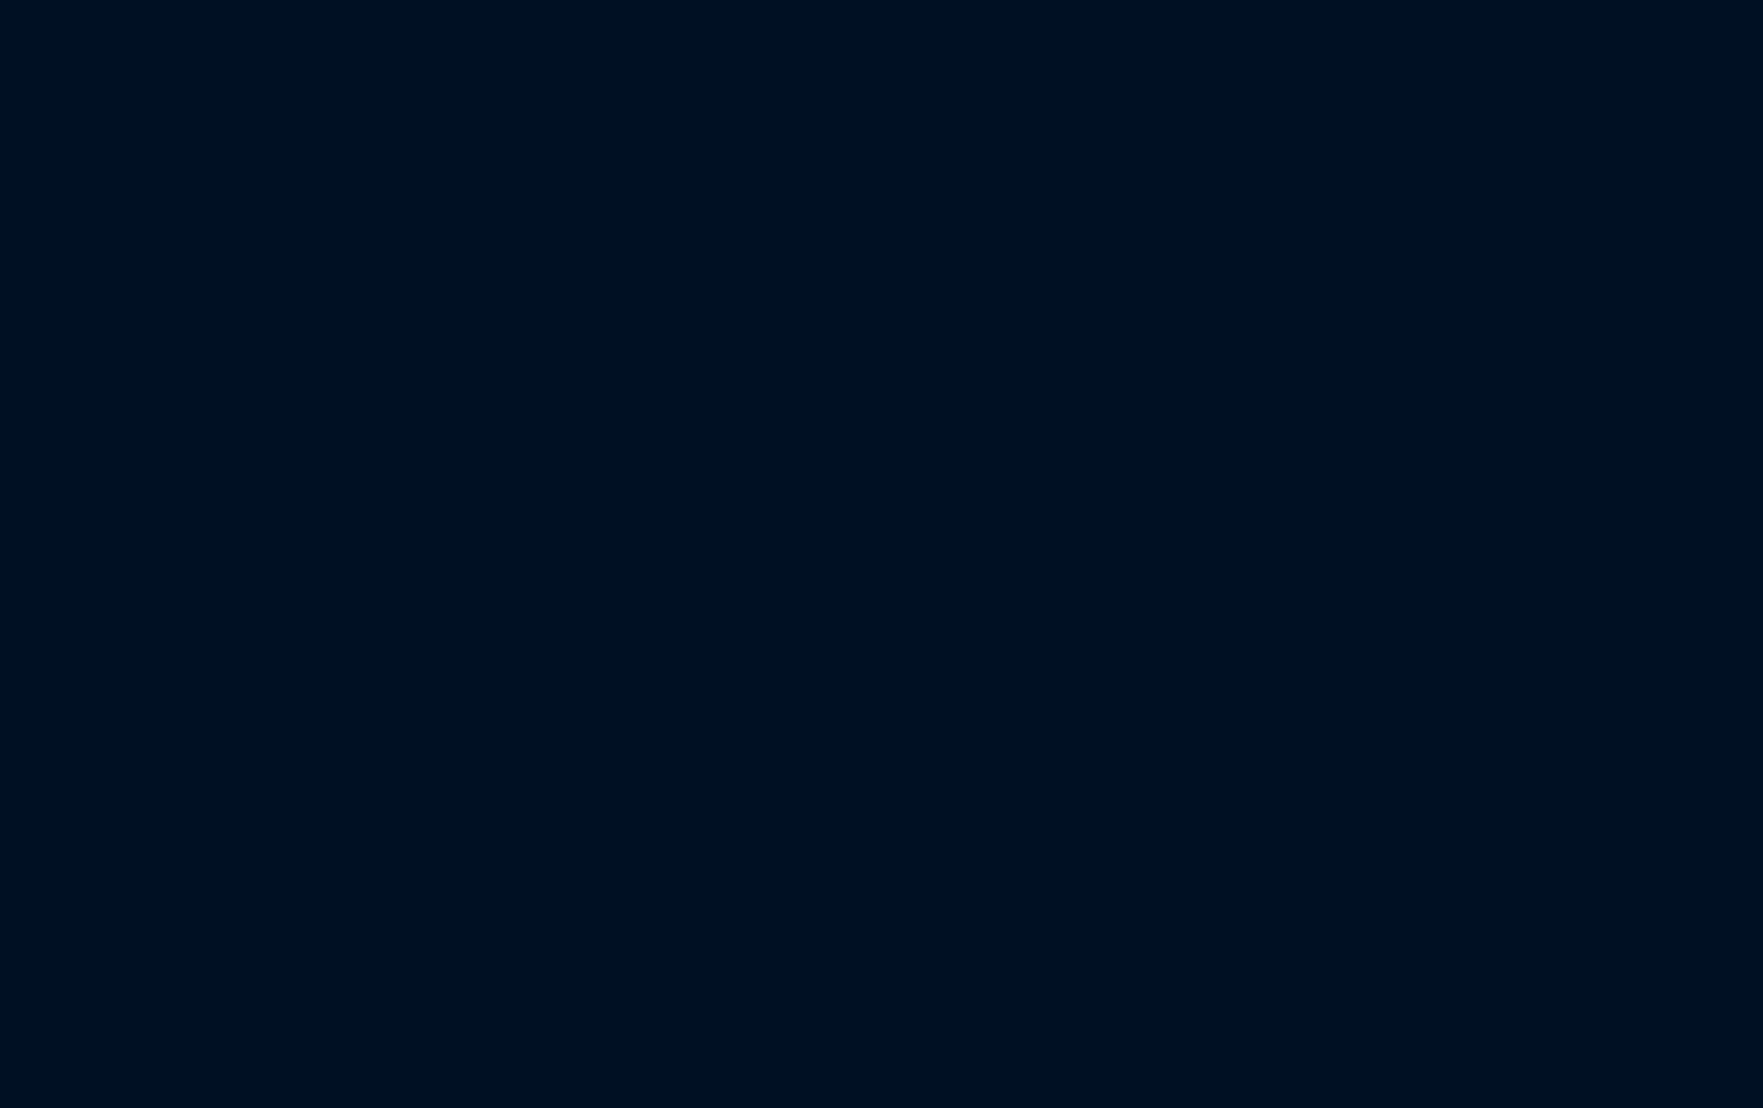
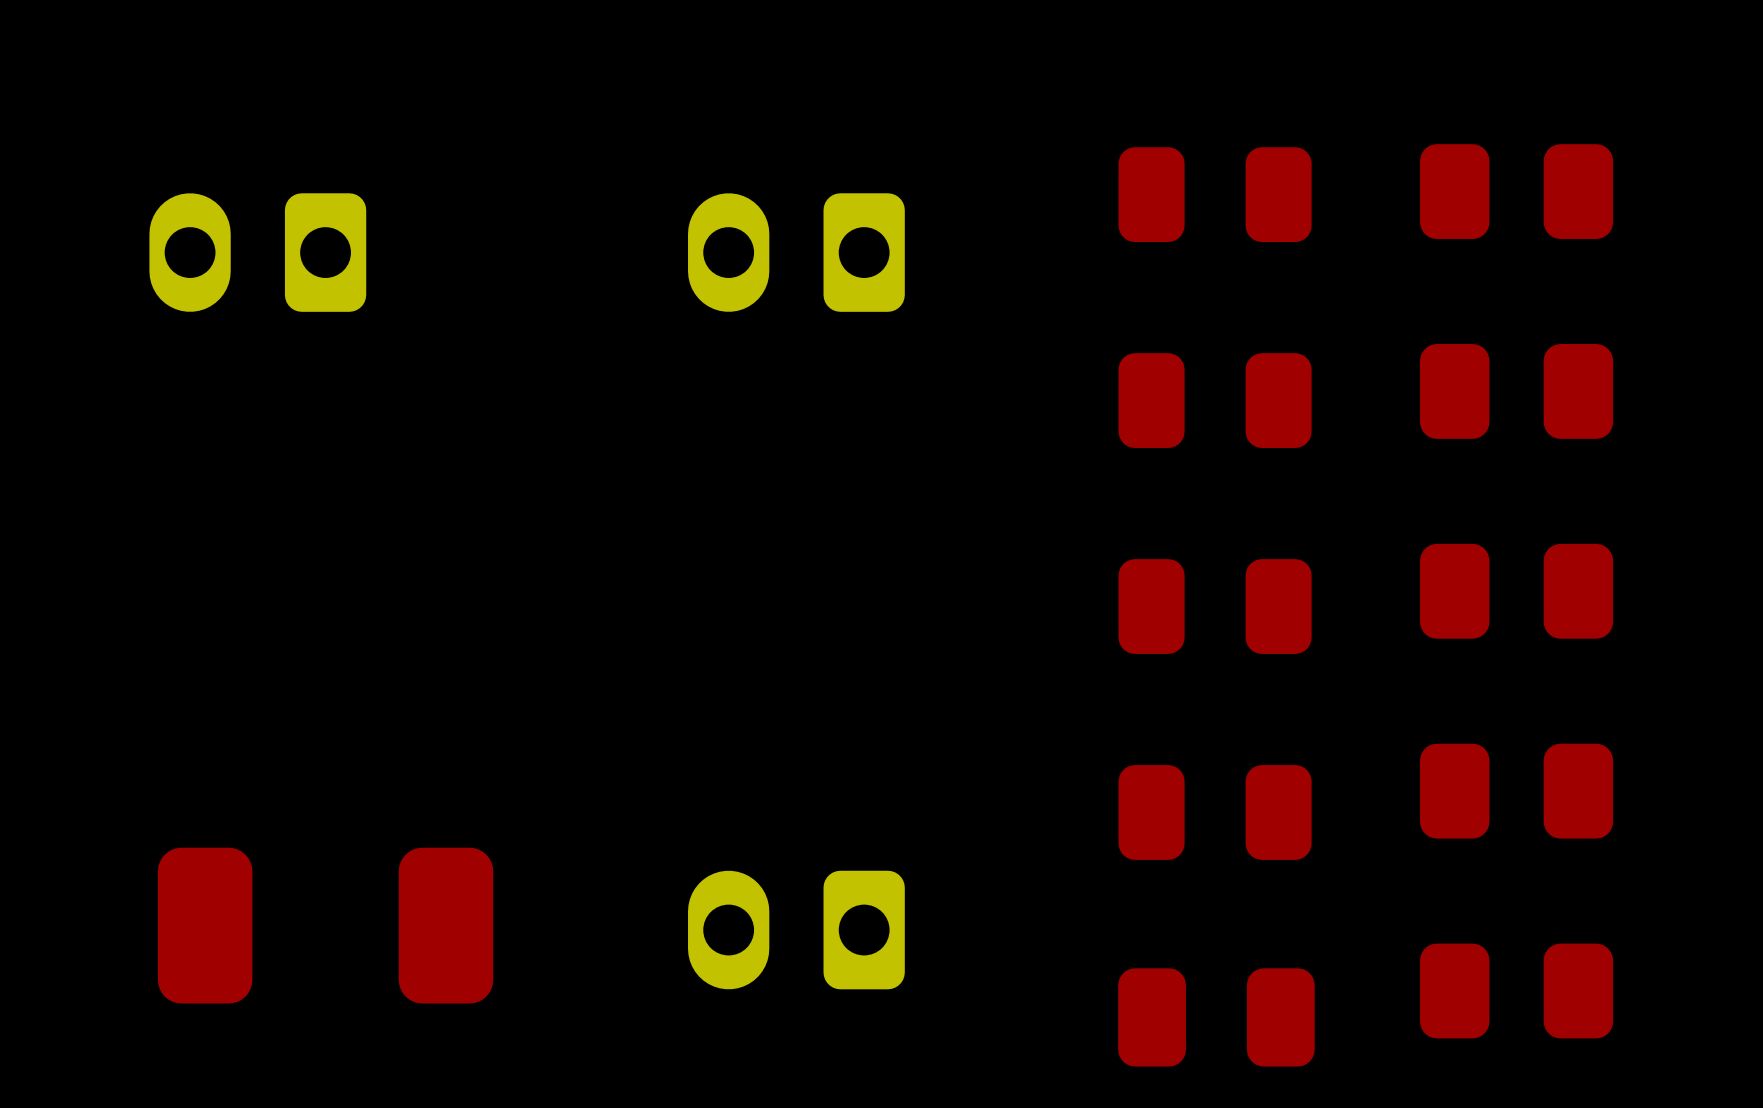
part: none -> (1516, 191)
part: none -> (1215, 194)
part: none -> (257, 252)
part: none -> (796, 252)
part: none -> (1516, 391)
part: none -> (1215, 400)
part: none -> (1516, 591)
part: none -> (1215, 606)
part: none -> (1516, 791)
part: none -> (1215, 812)
part: none -> (325, 925)
part: none -> (796, 930)
part: none -> (1516, 991)
part: none -> (1216, 1017)

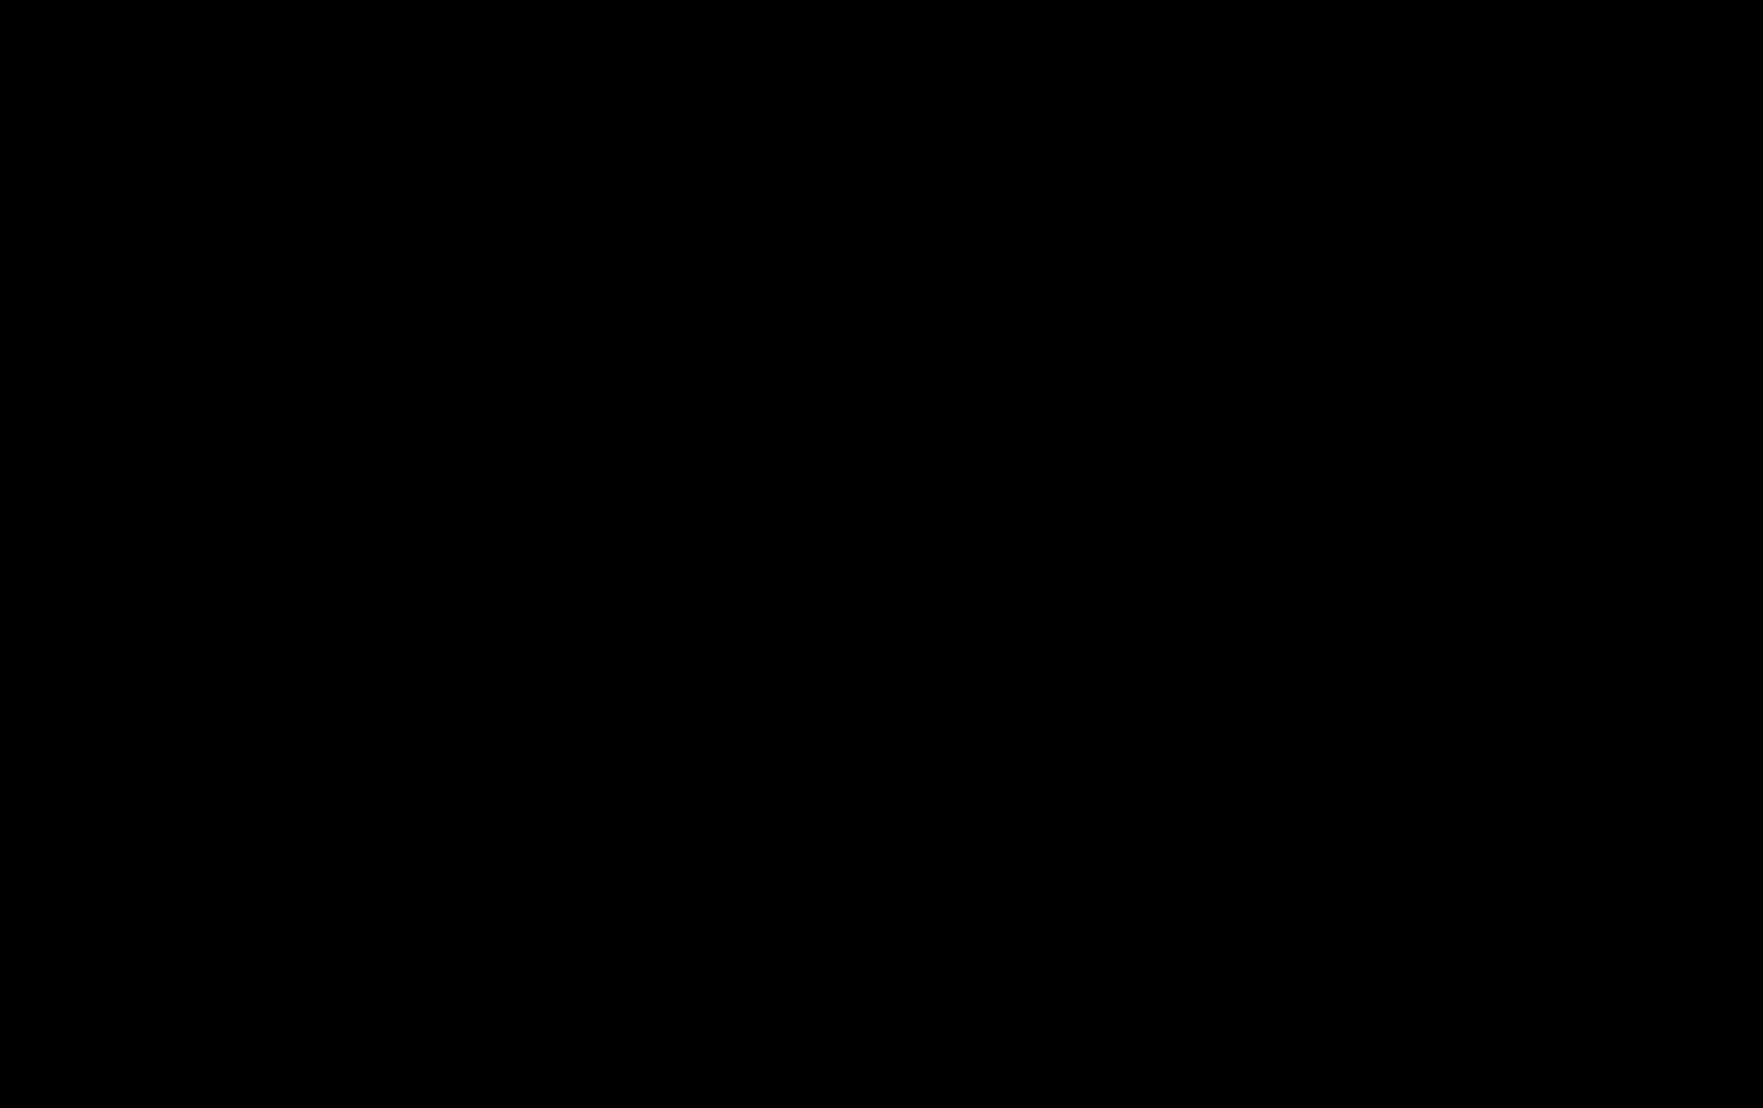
part: (1516, 191) -> none
part: (1215, 194) -> none
part: (257, 252) -> none
part: (796, 252) -> none
part: (1516, 391) -> none
part: (1215, 400) -> none
part: (1516, 591) -> none
part: (1215, 606) -> none
part: (1516, 791) -> none
part: (1215, 812) -> none
part: (325, 925) -> none
part: (796, 930) -> none
part: (1516, 991) -> none
part: (1216, 1017) -> none

